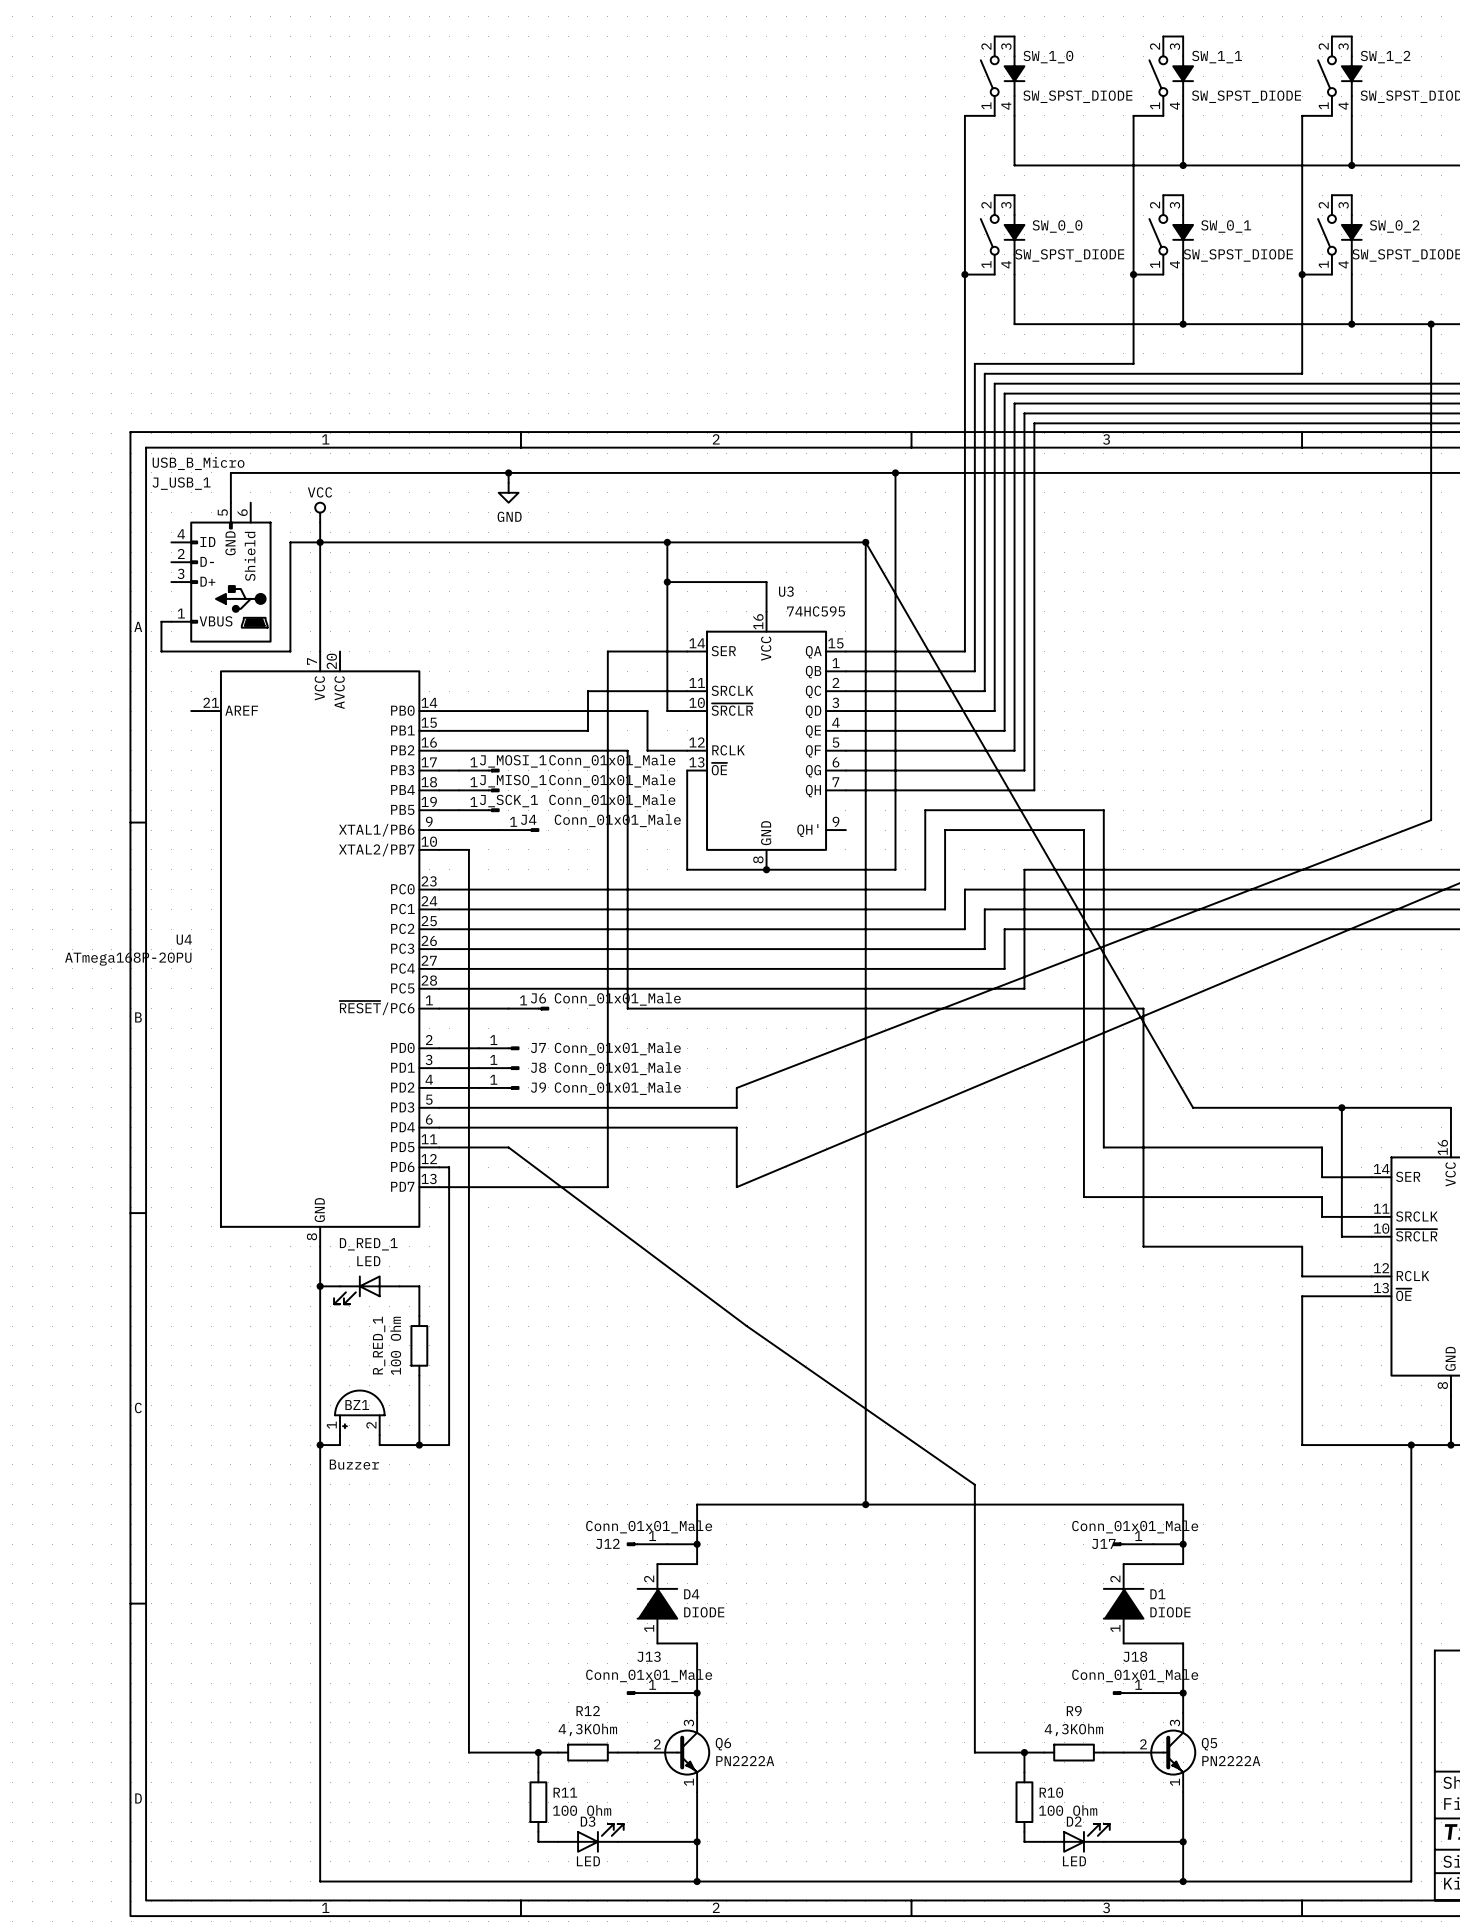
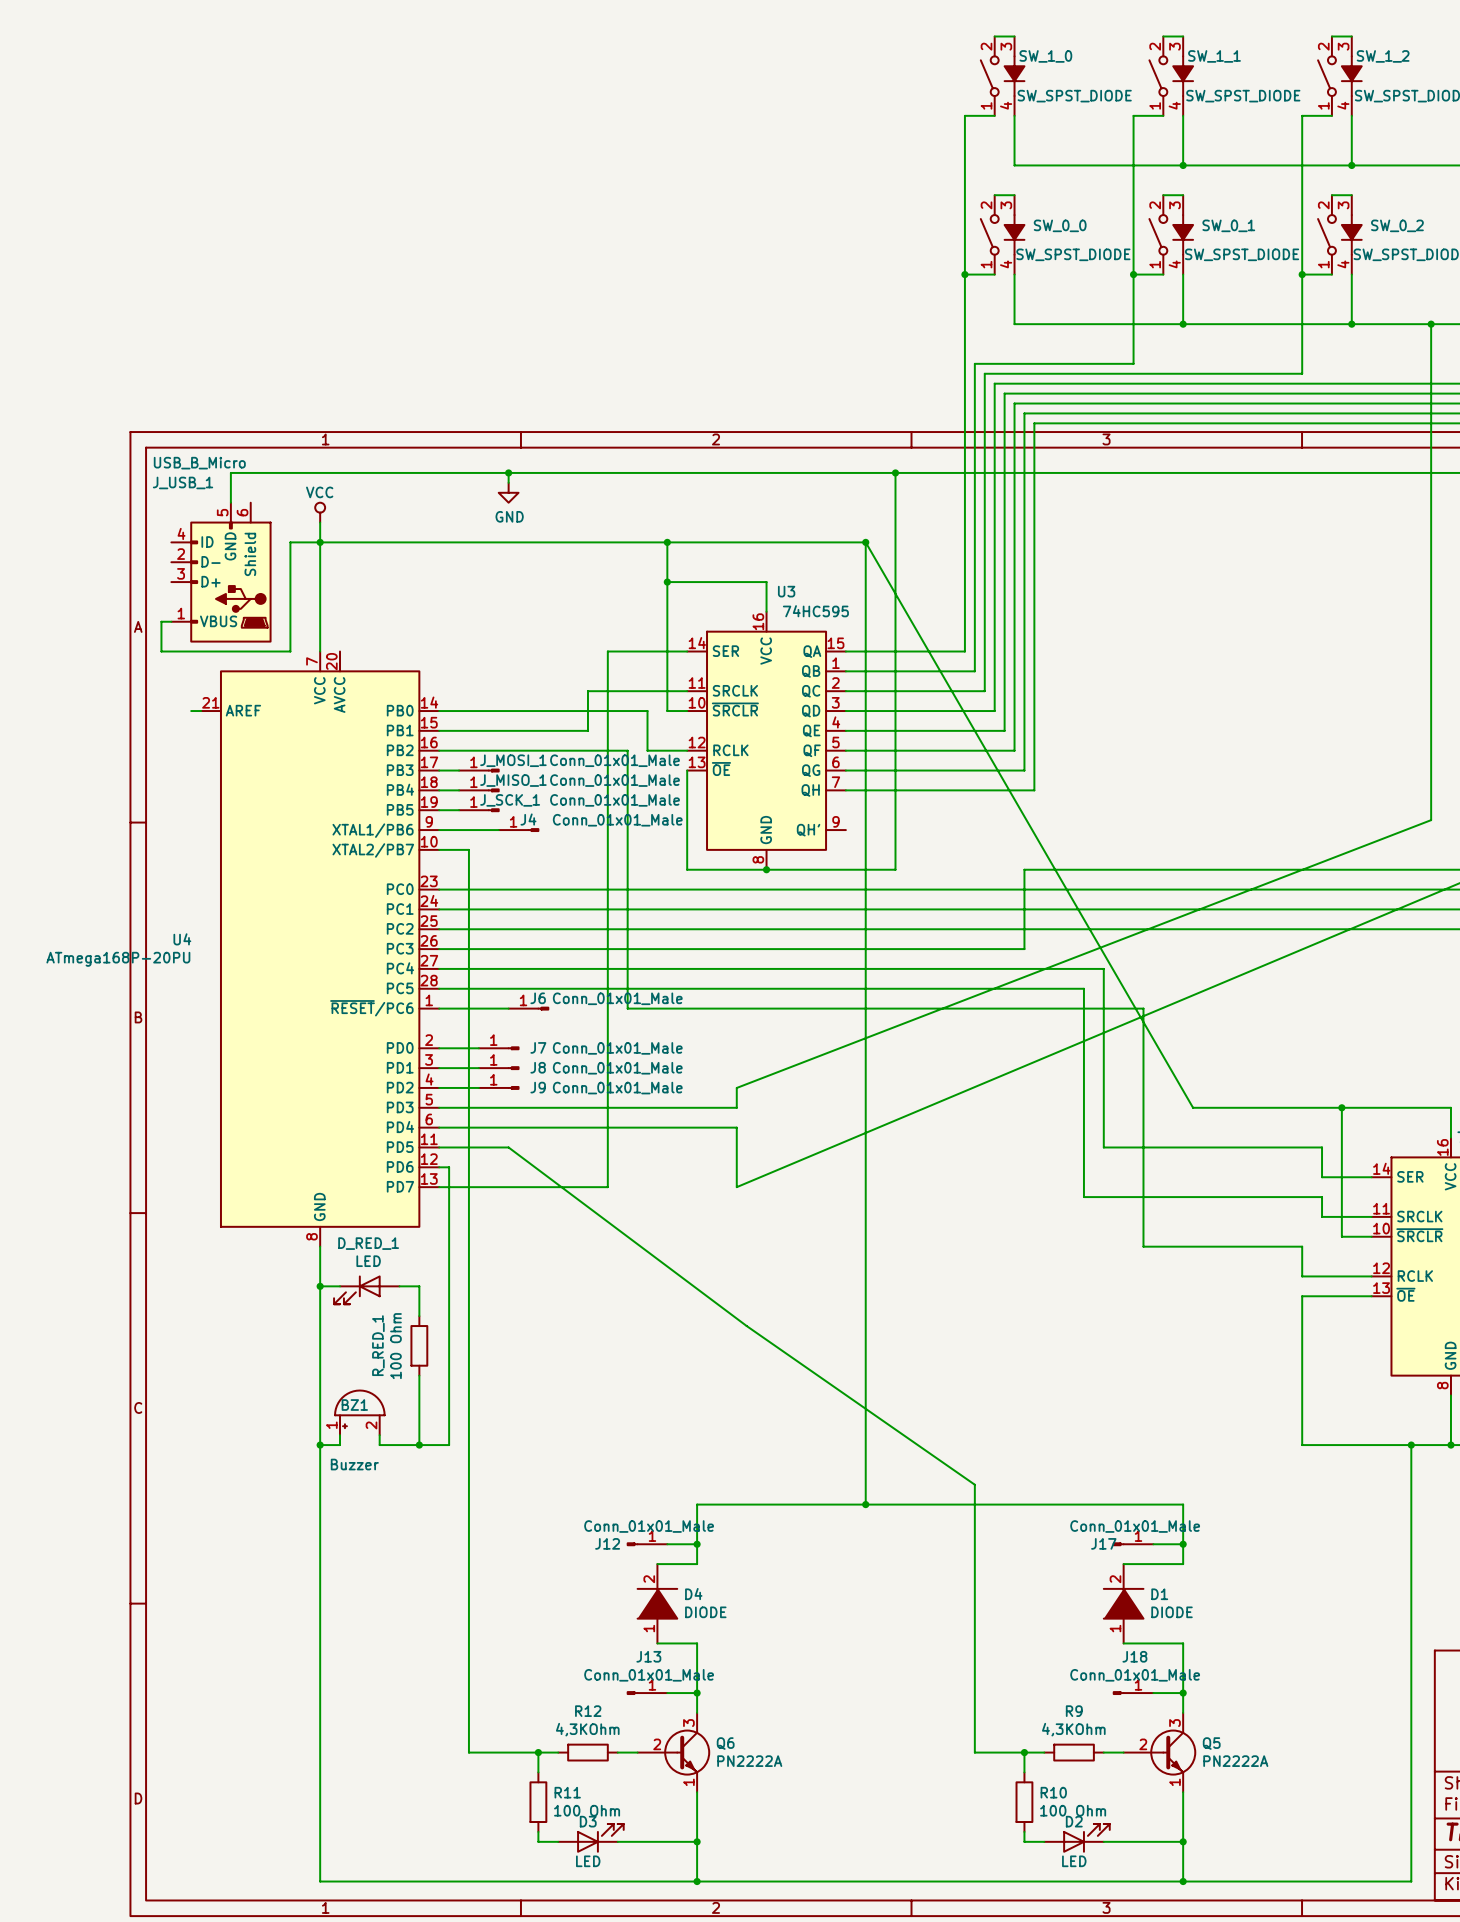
wire: (925, 889) (925, 810) (1103, 810) (1103, 968) -> (1004, 968) (1103, 968)
wire: (964, 889) (964, 929) -> (964, 889) (925, 889)
wire: (945, 909) (945, 830) (1083, 830) (1083, 988) -> (1024, 988) (1083, 988)
wire: (984, 909) (984, 949) -> (984, 909) (945, 909)
wire: (1004, 929) (1004, 968) -> (1004, 929) (964, 929)
wire: (1024, 949) (1024, 988) -> (1024, 949) (984, 949)

